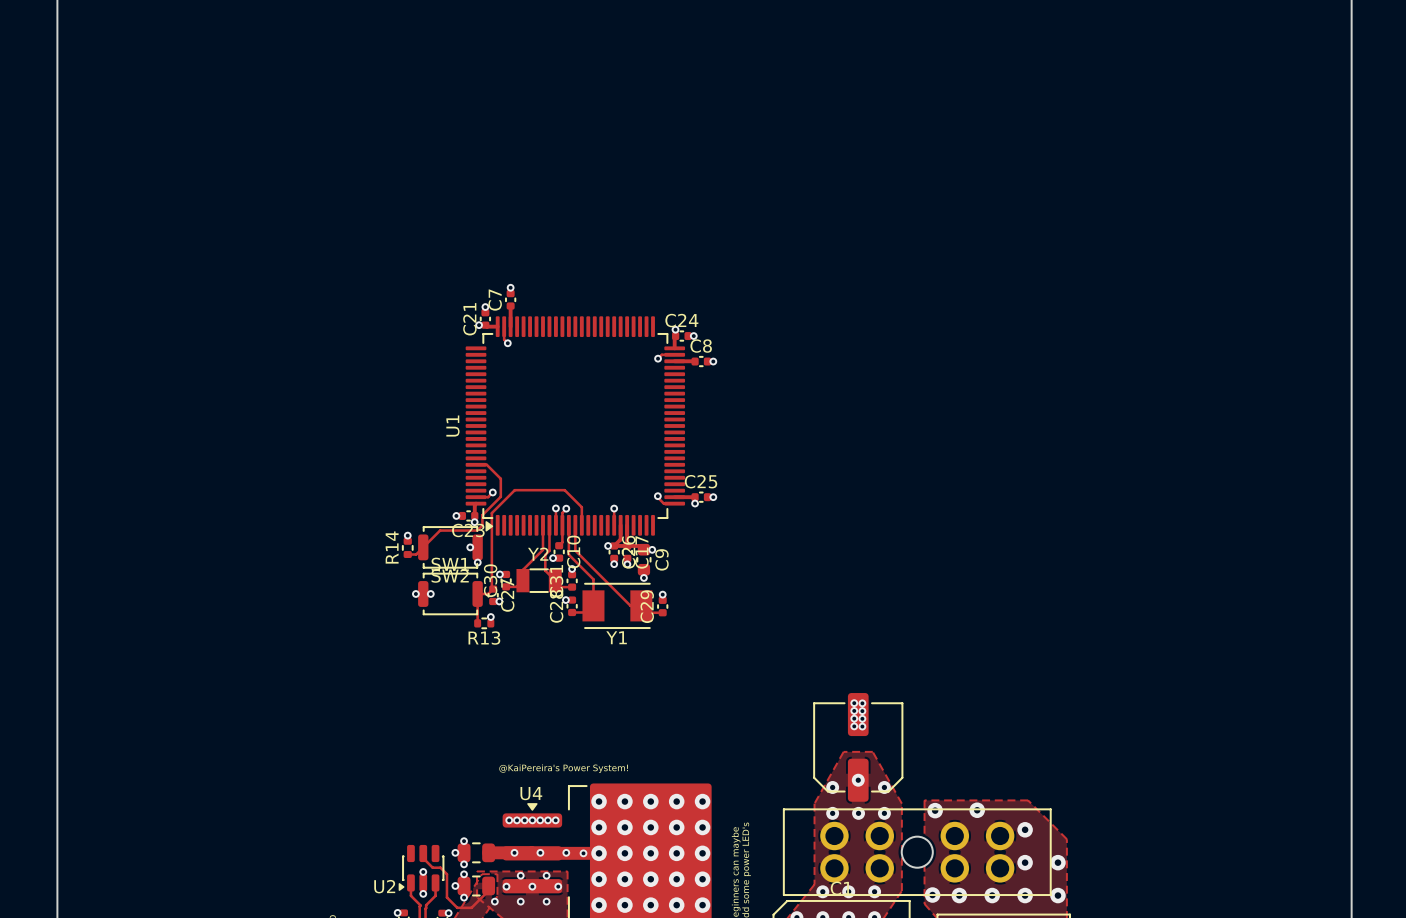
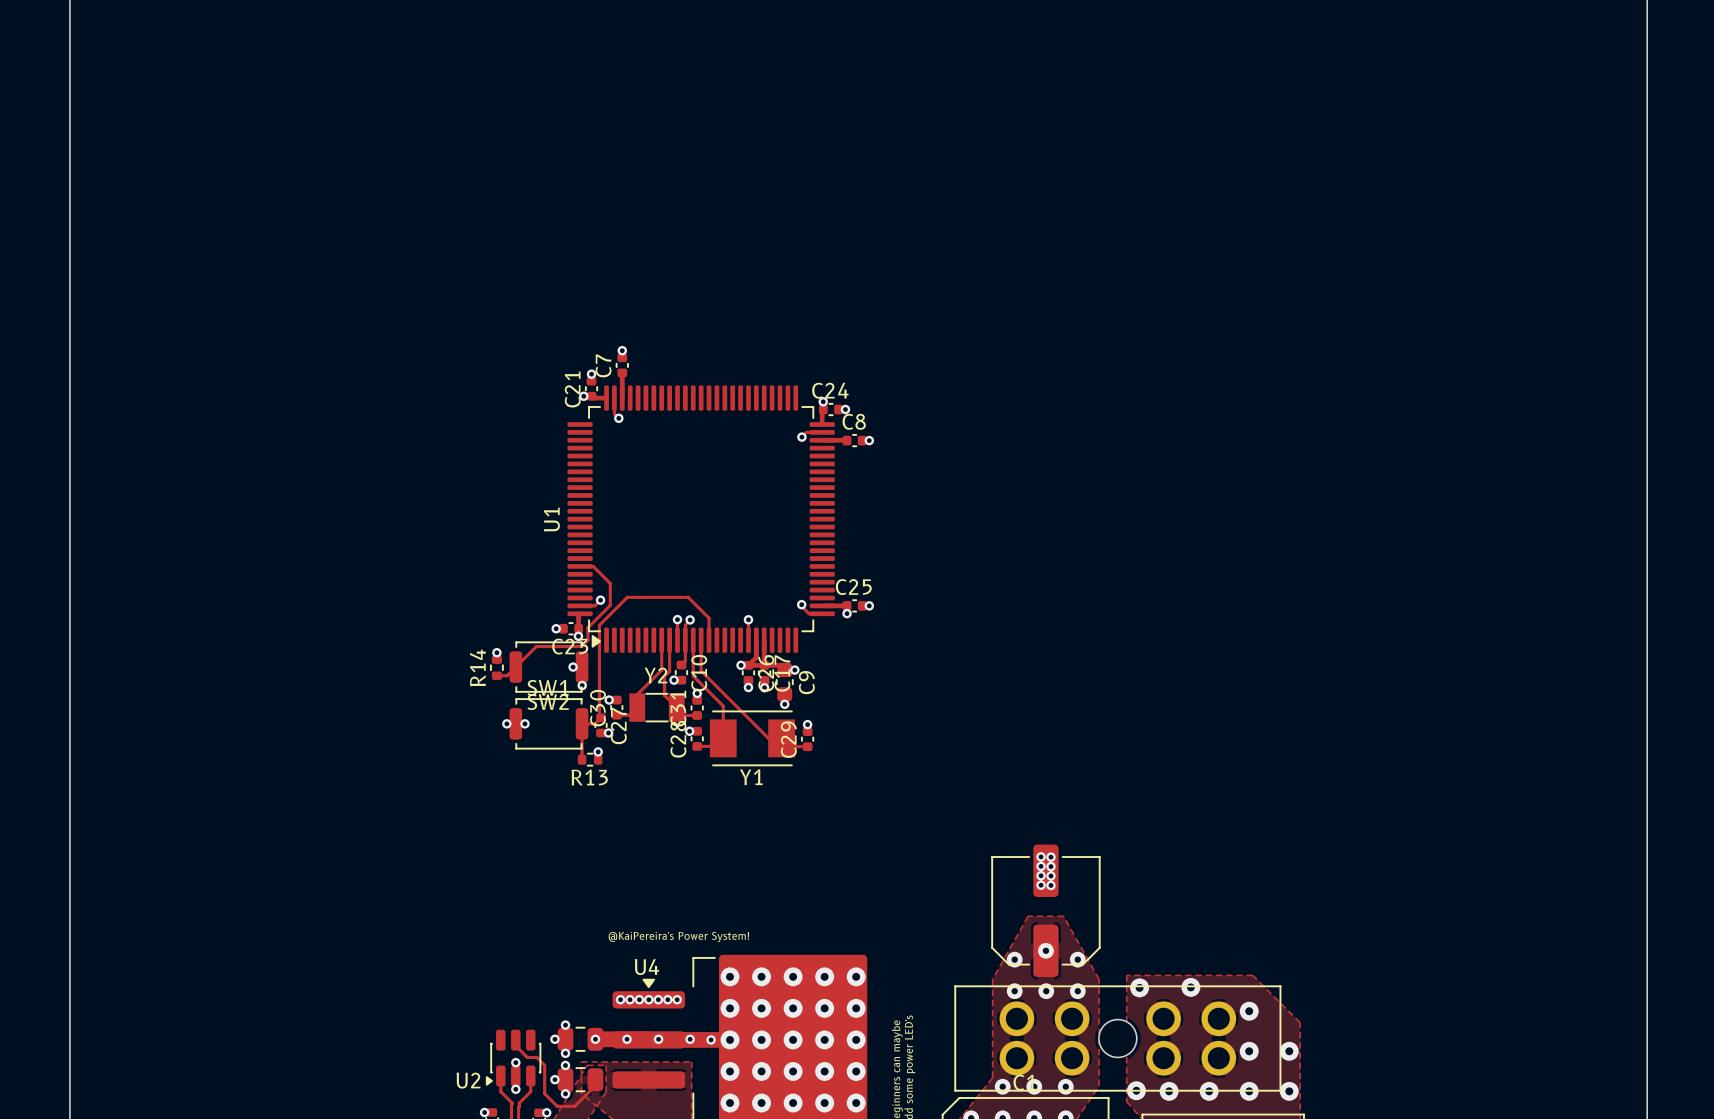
via: none -> (595, 1039)
via: (520, 875) -> none
via: (546, 875) -> none
via: (506, 886) -> none
via: (532, 886) -> none
via: (558, 886) -> none
via: (494, 901) -> none
via: (520, 901) -> none
via: (546, 901) -> none

